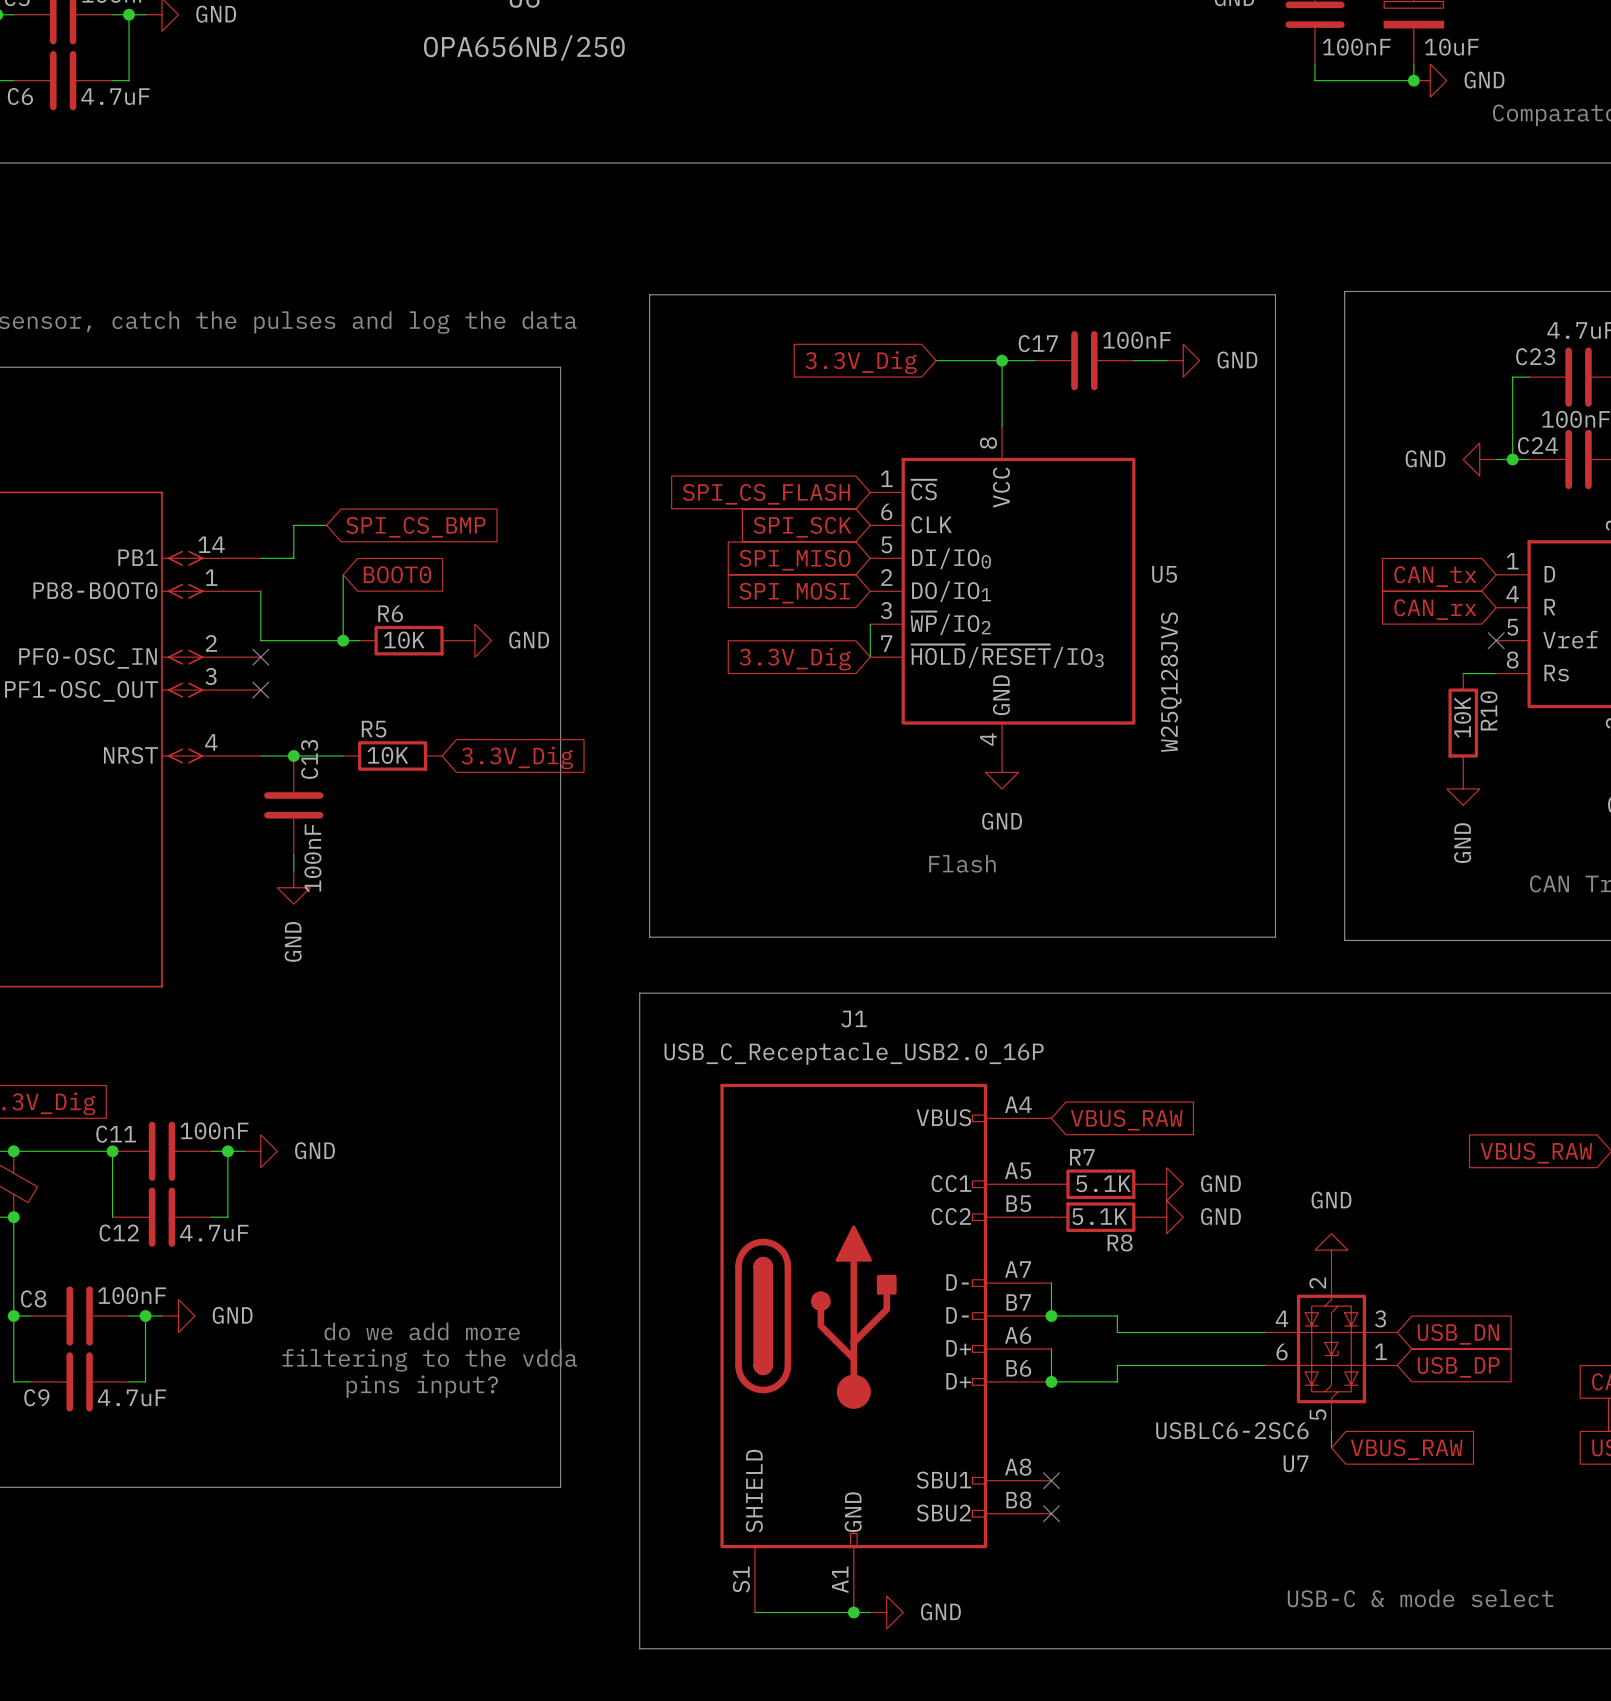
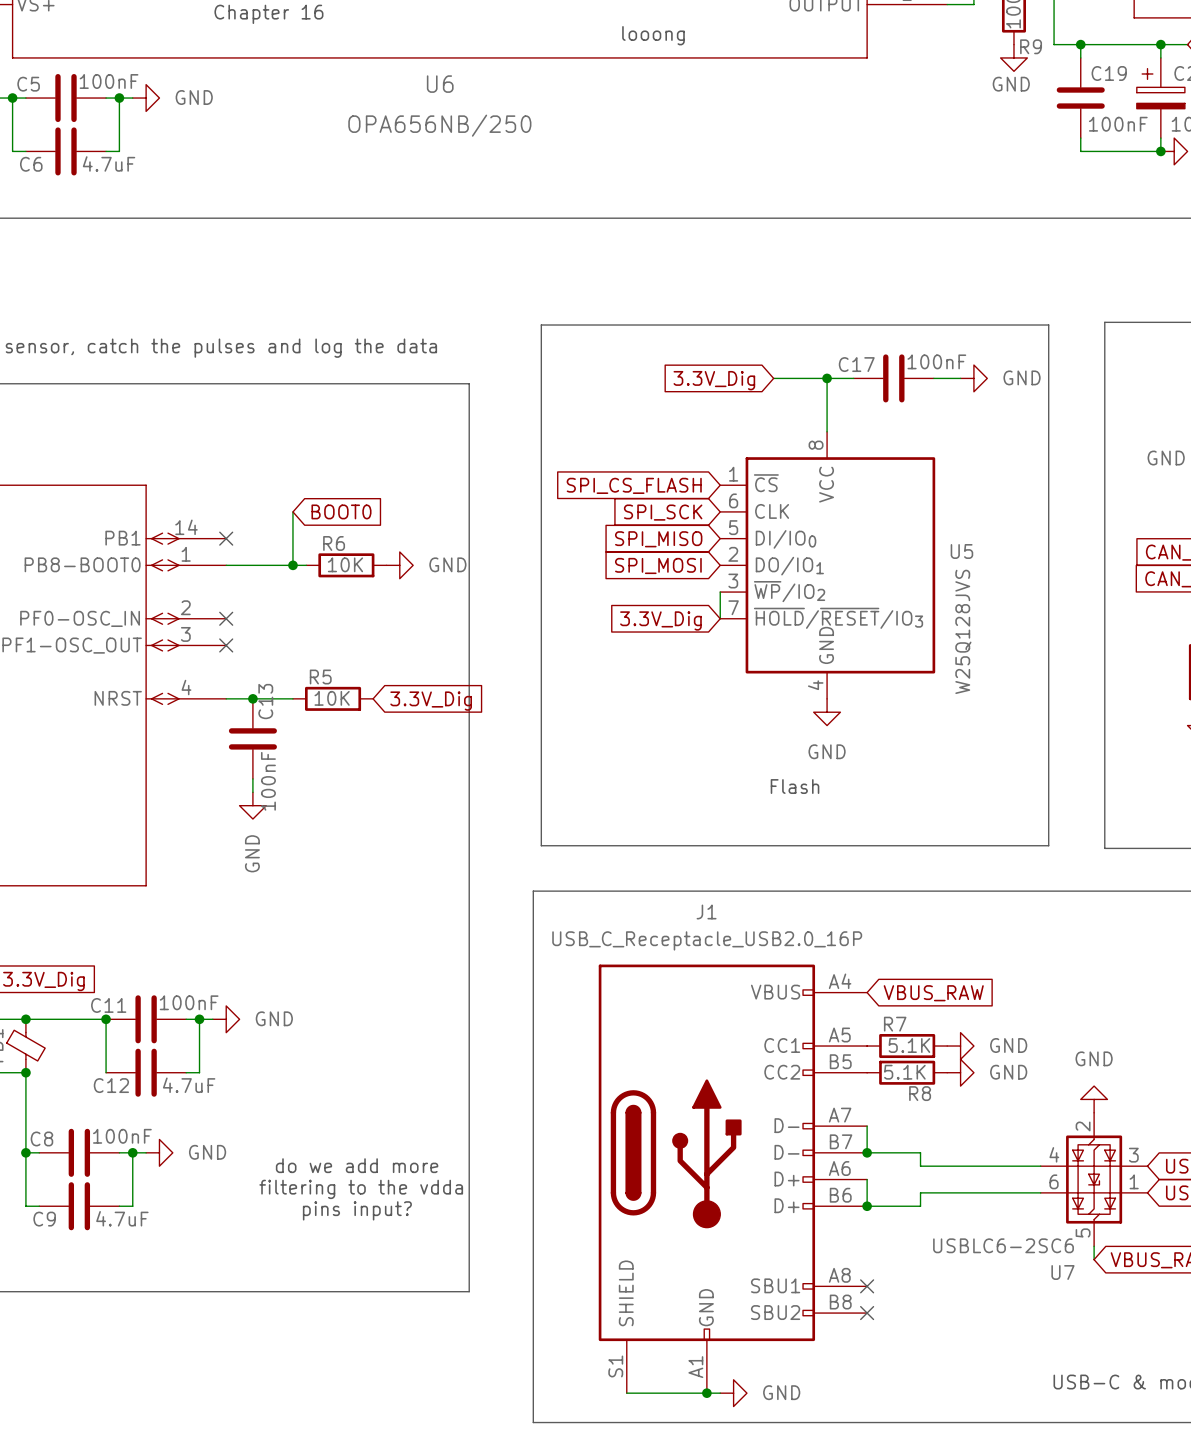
wire: (326, 525) (293, 525) (293, 558) (260, 558) -> none
global label: SPI_CS_BMP (415, 527) -> none
no-connect mark: none -> (226, 538)
global label position: BOOT0 (397, 574) -> BOOT0 (341, 511)
wire: (260, 591) (260, 640) (359, 640) -> (226, 565) (306, 565)
wire: (343, 591) (343, 640) -> (292, 511) (292, 551)
junction position: (343, 640) -> (292, 565)
R6 position: (409, 640) -> (346, 565)
power symbol position: GND (474, 640) -> GND (399, 565)

